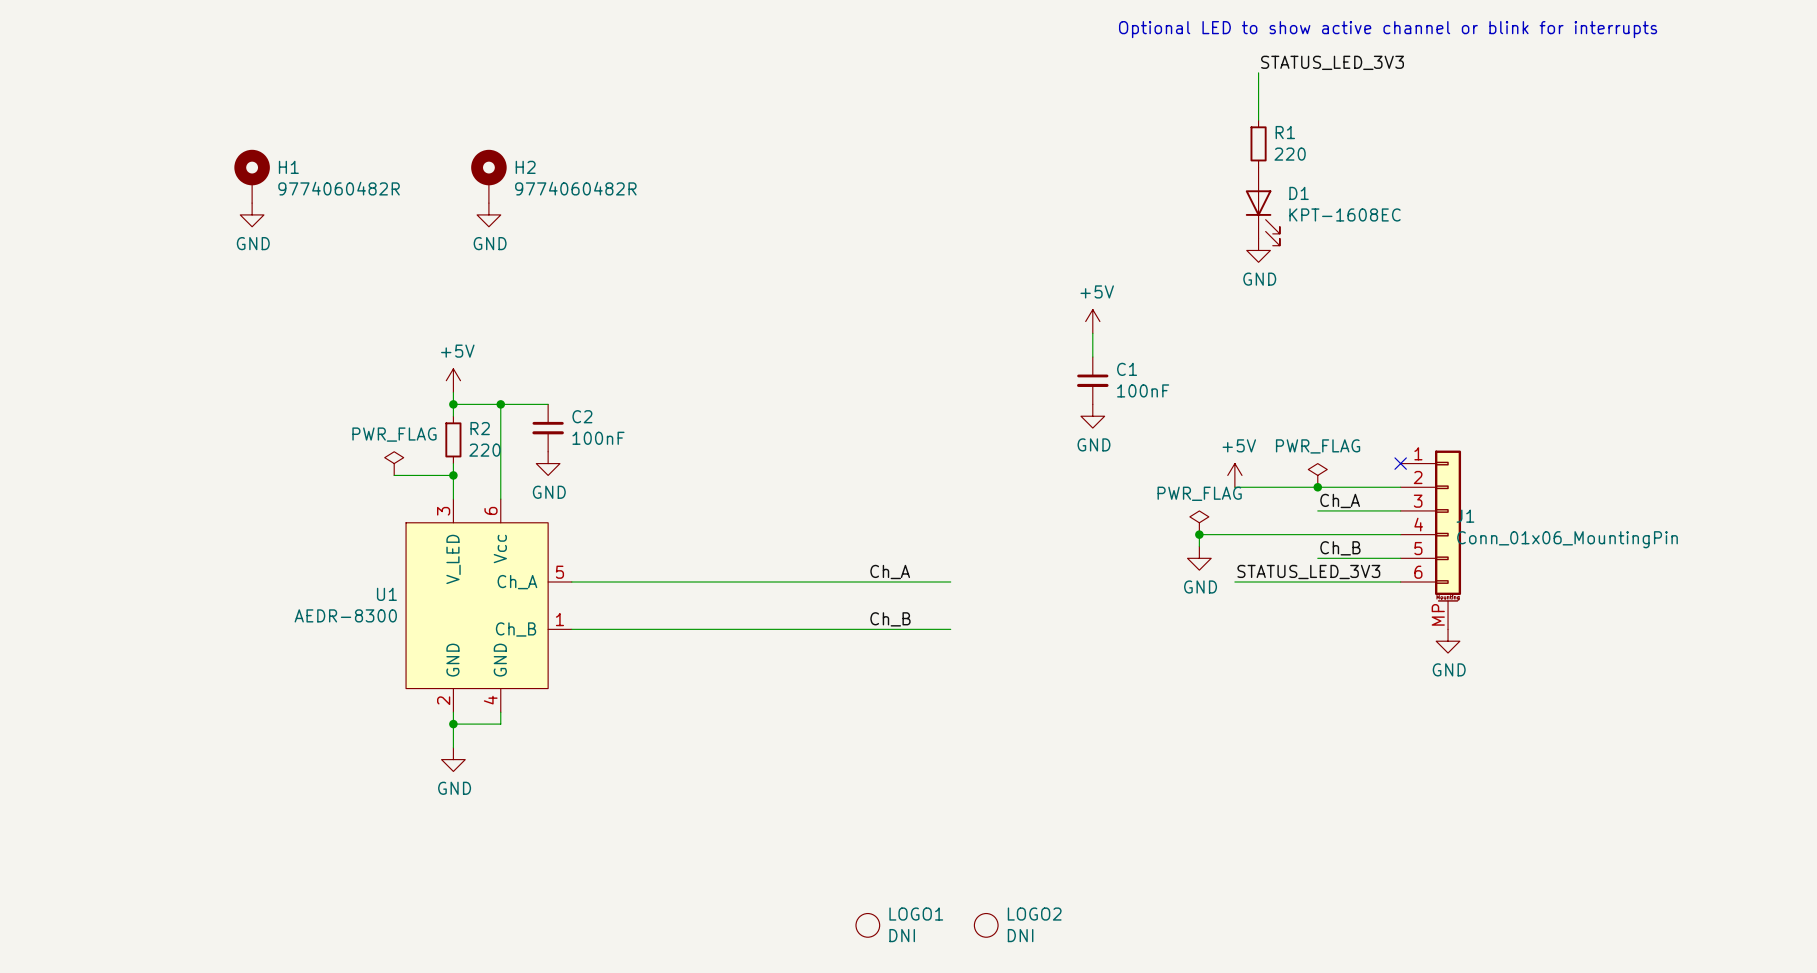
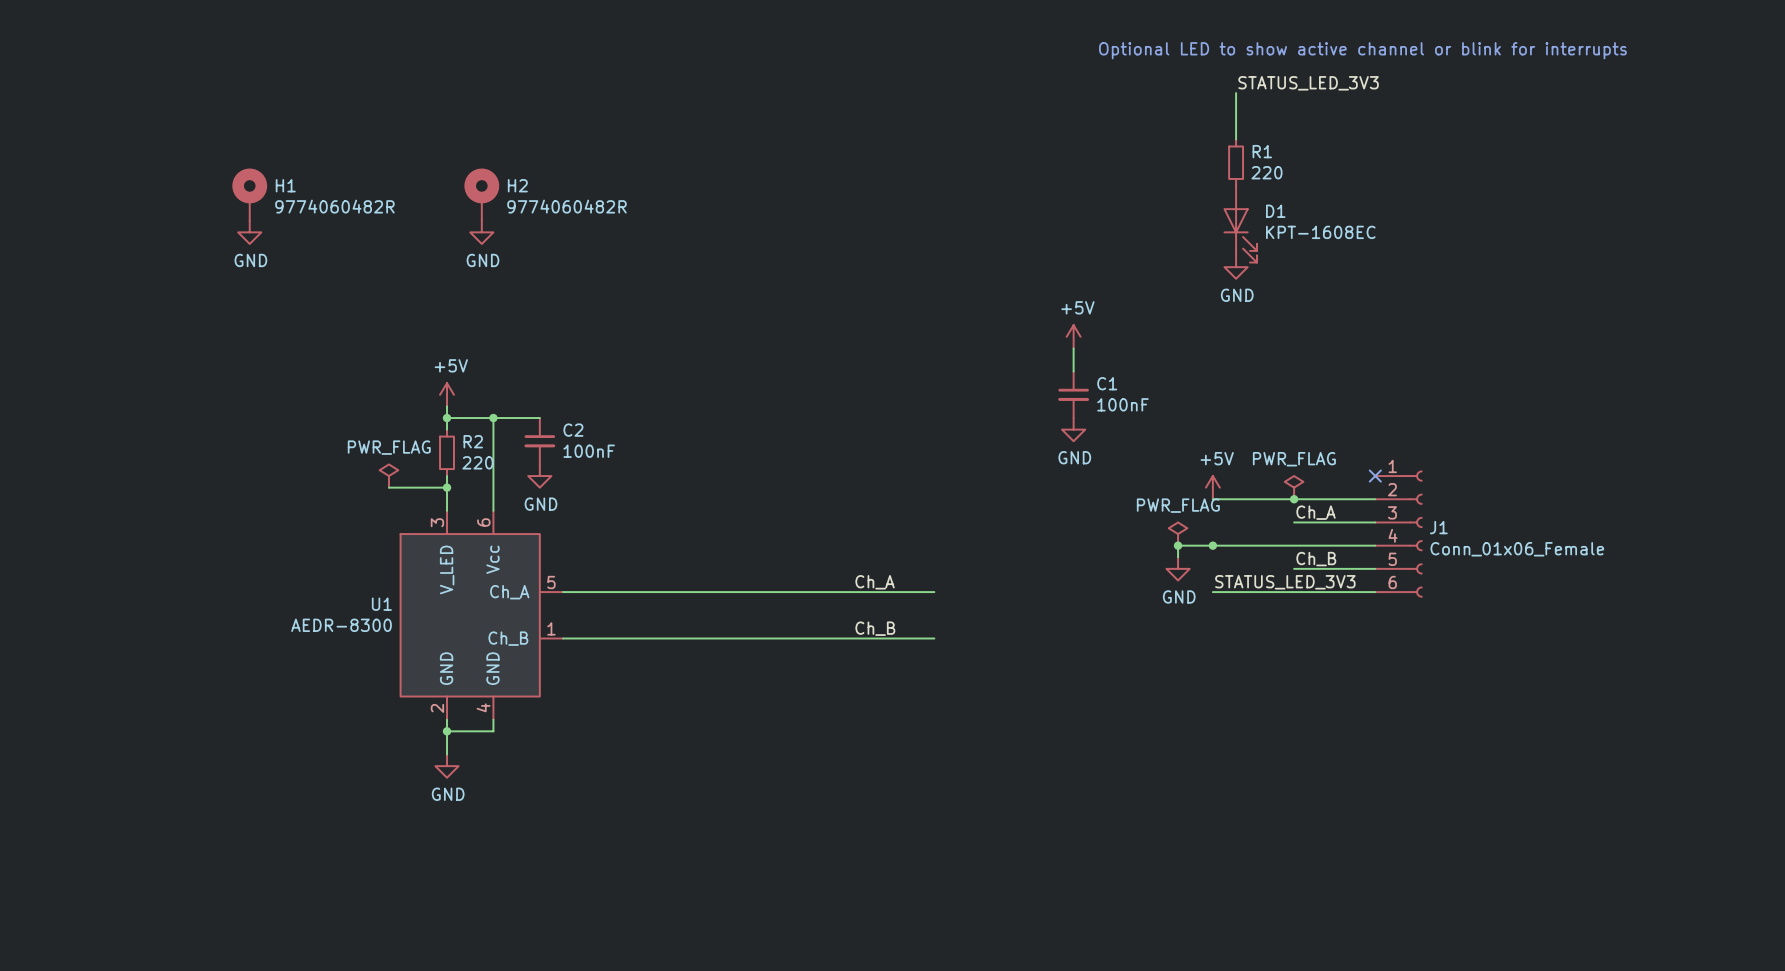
J1 symbol: [1400, 450, 1462, 630] -> [1375, 470, 1423, 598]
junction: none -> (1212, 545)
J1 value: Conn_01x06_MountingPin (1567, 539) -> Conn_01x06_Female (1517, 549)
power symbol: GND (1448, 641) -> none
LOGO1: DNI (867, 925) -> none
LOGO2: DNI (986, 925) -> none

